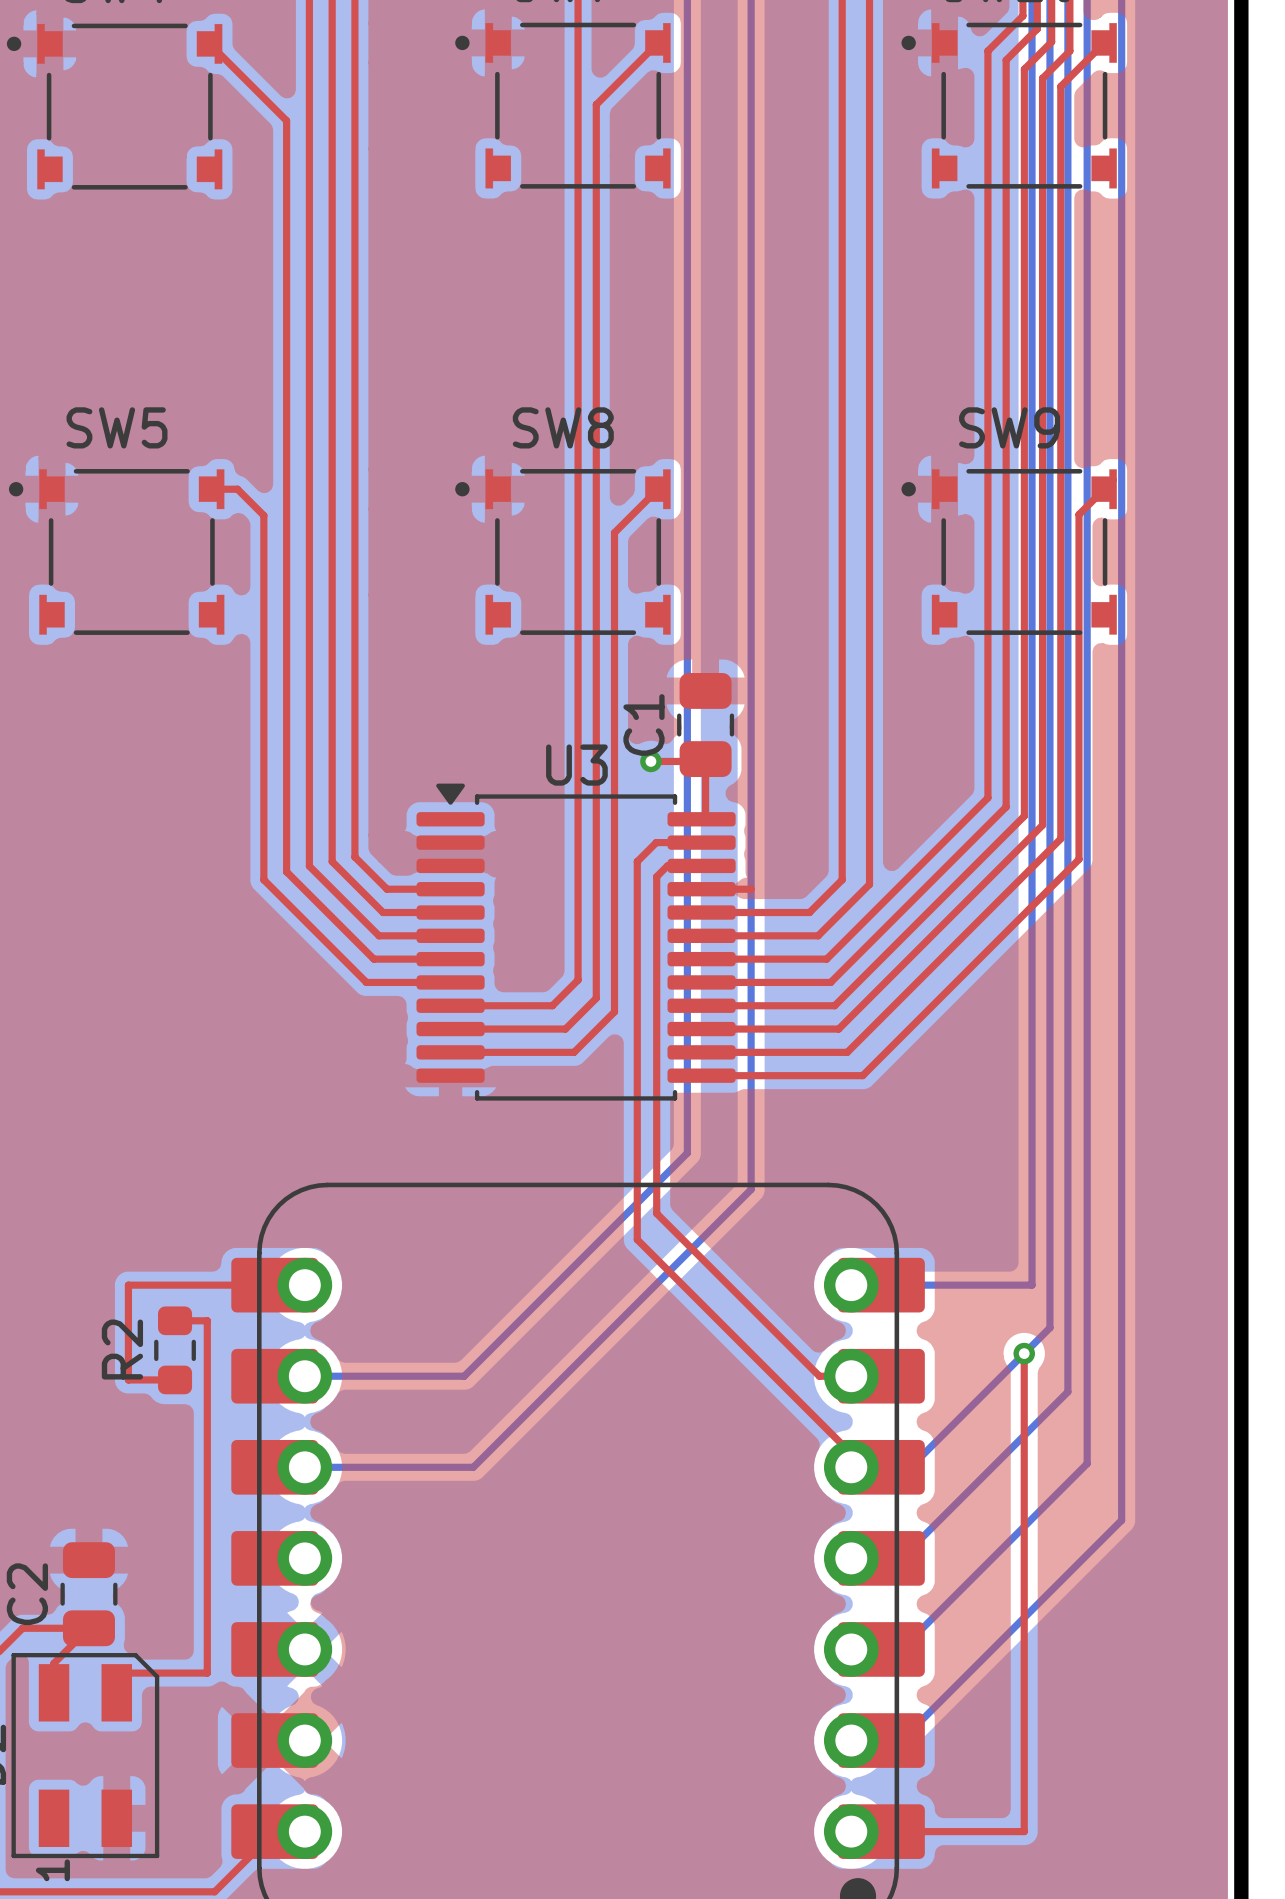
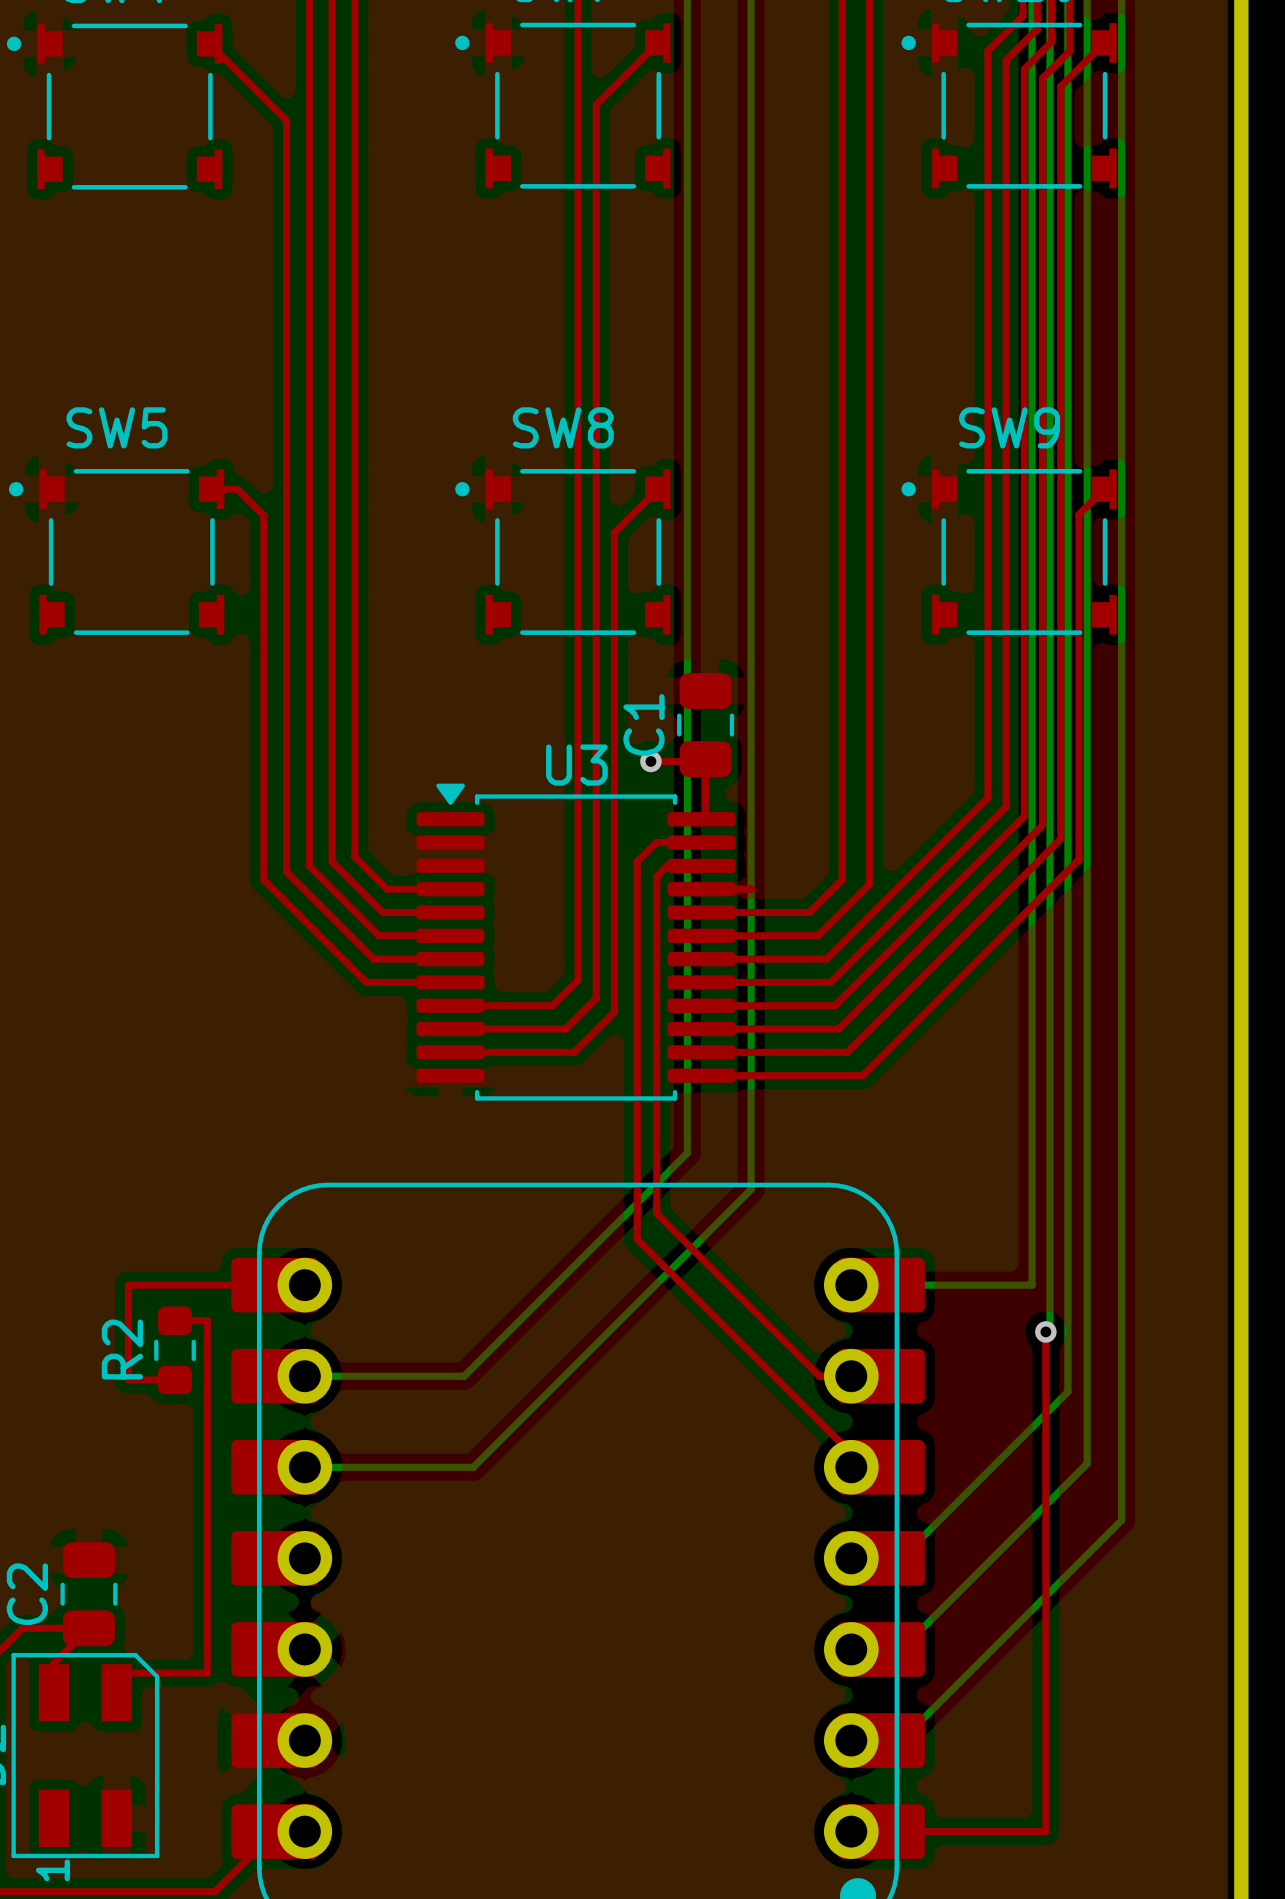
bottom track: (1045, 1331) (915, 1462) -> none
top track: (1024, 1353) (1024, 1831) -> (1045, 1331) (1045, 1831) (1024, 1831)
via position: (1024, 1353) -> (1045, 1331)

